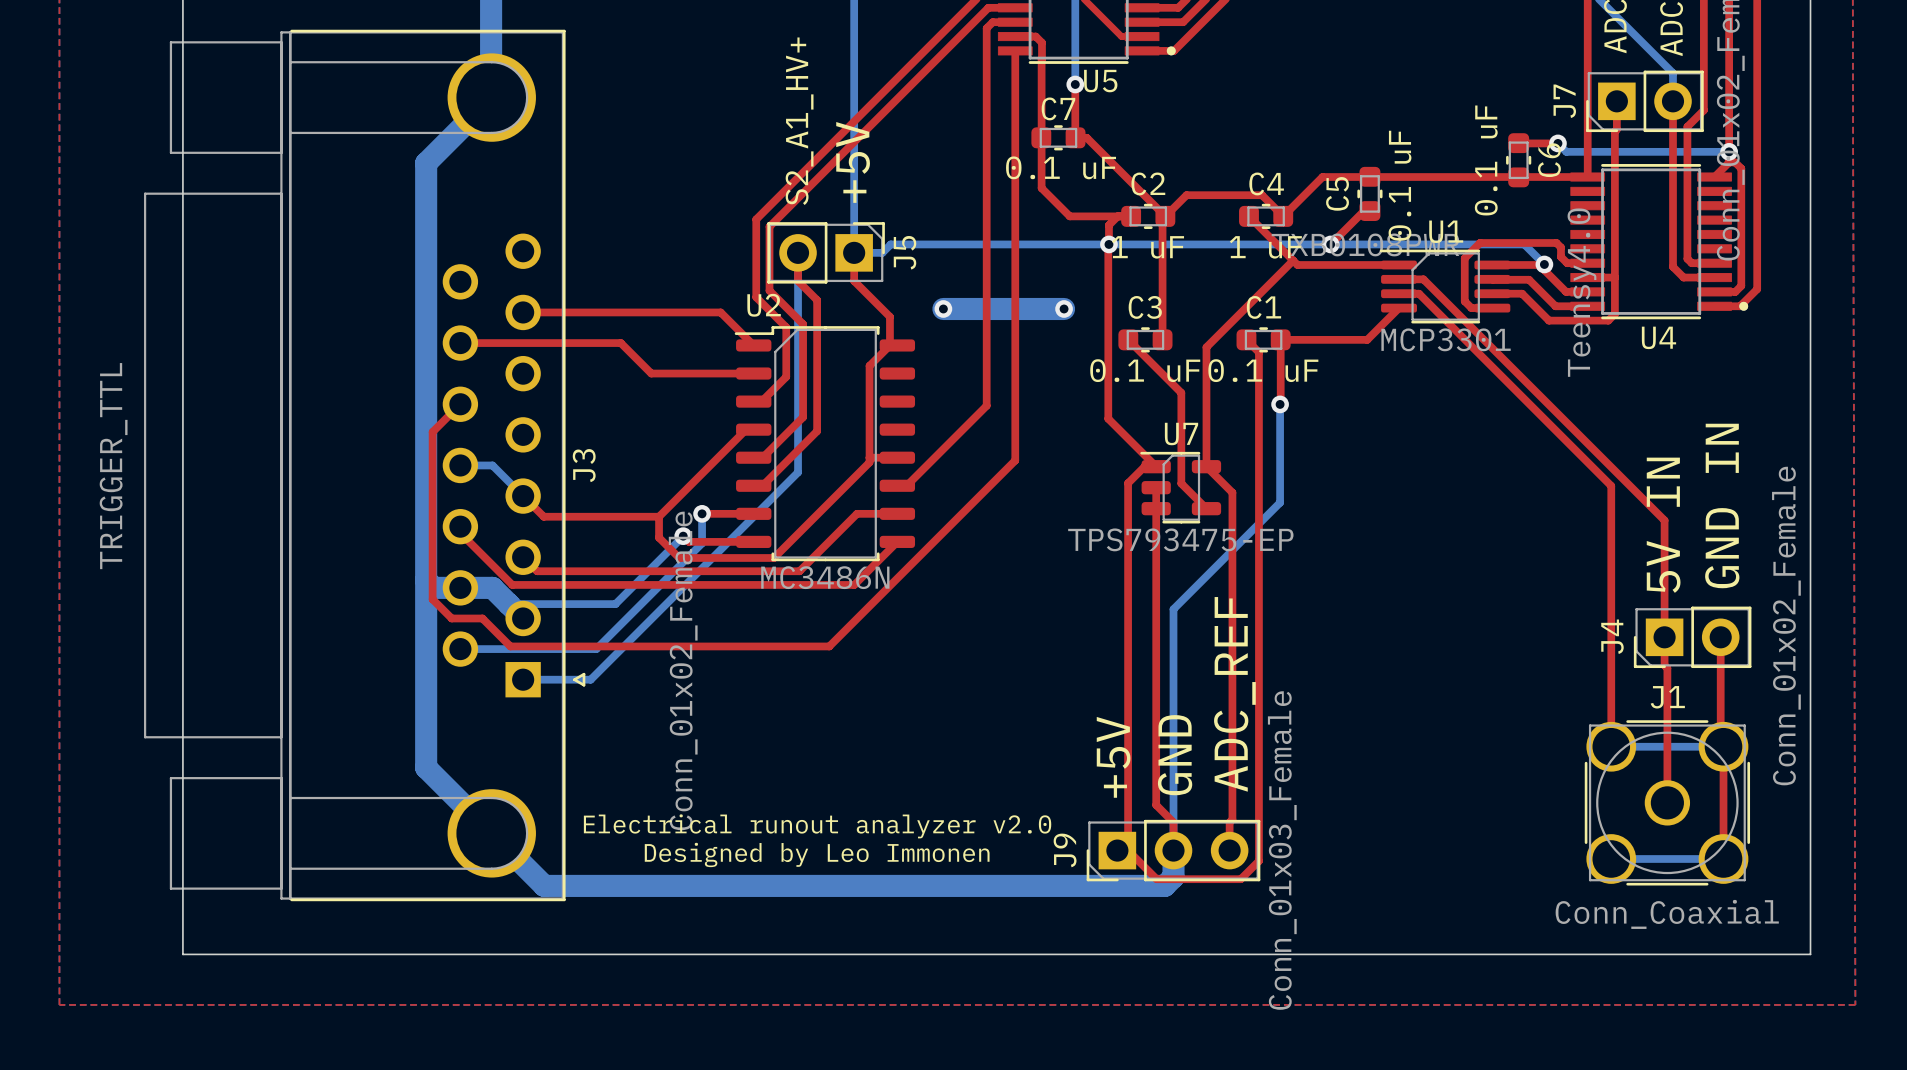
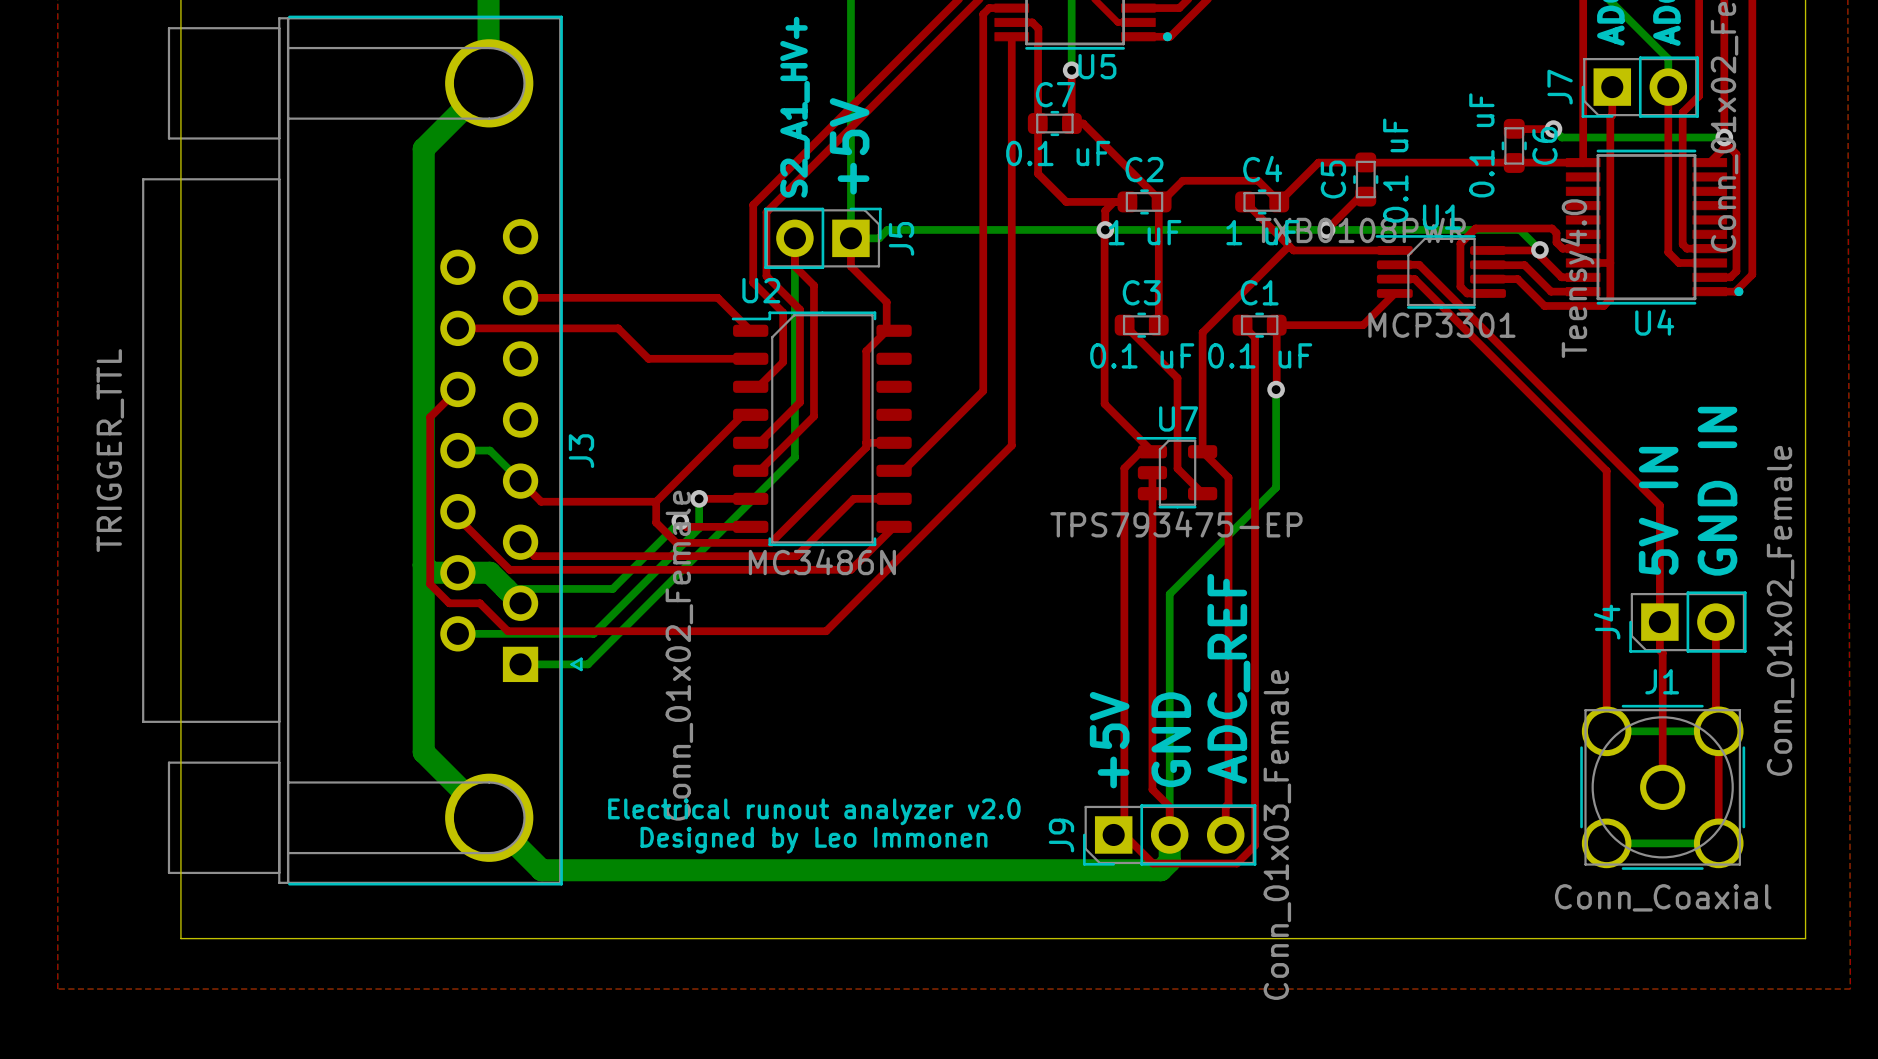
bottom track: (943, 308) (1064, 308) -> none
via: (943, 308) -> none
via: (1064, 308) -> none

